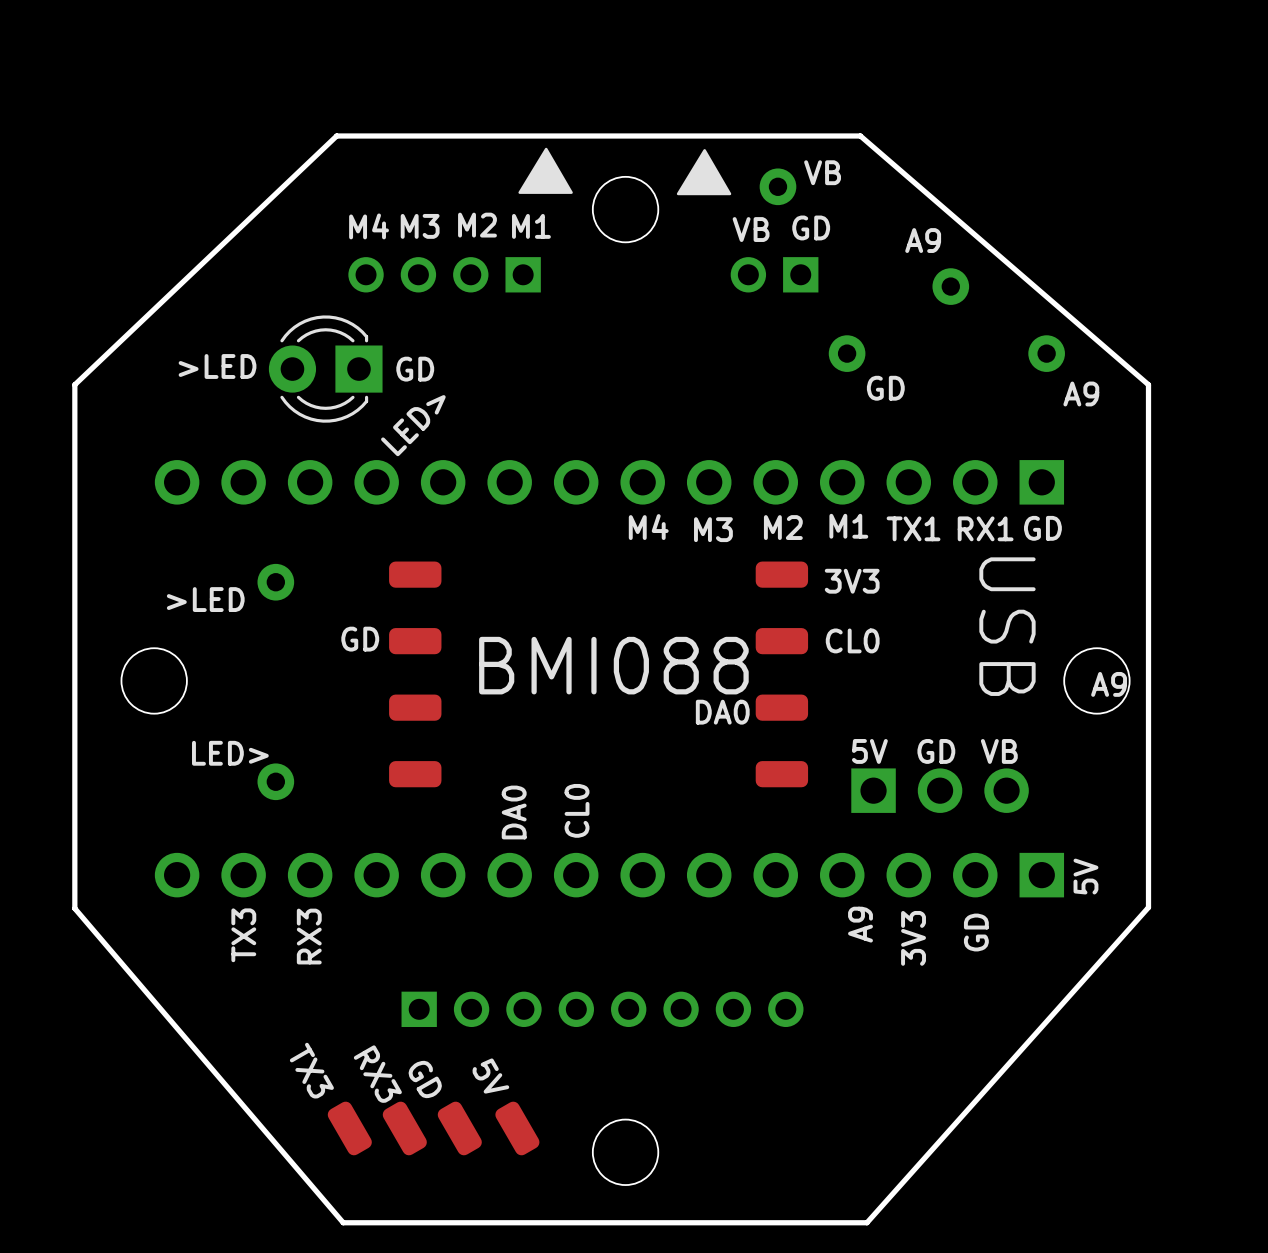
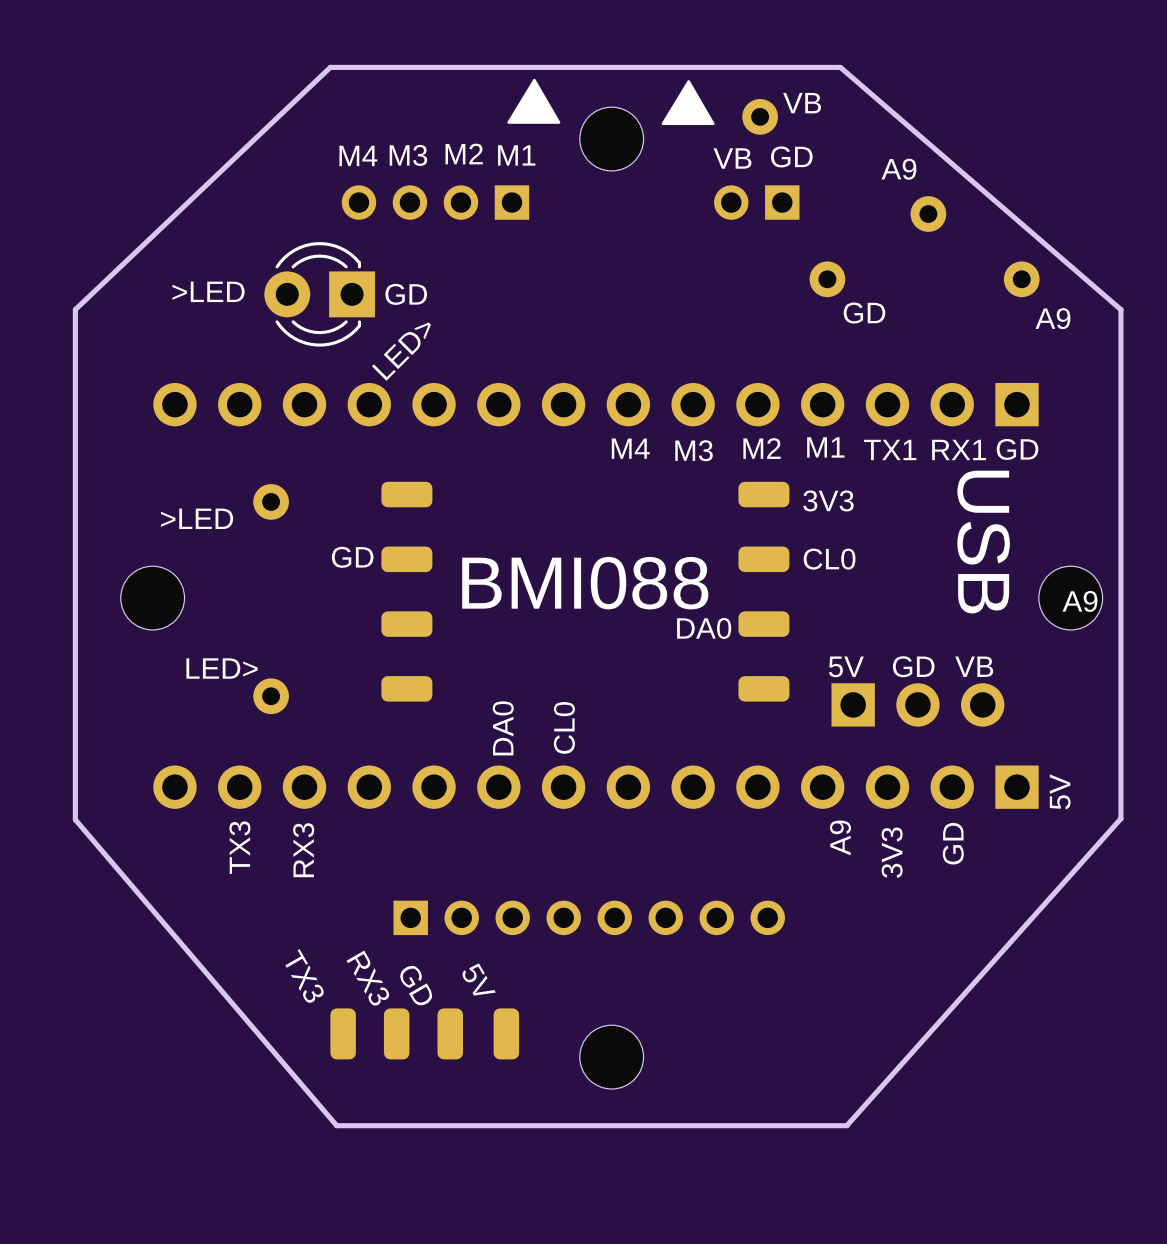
part rotation: 0° (349, 1128) -> 30° clockwise (343, 1033)
part rotation: 0° (404, 1128) -> 30° clockwise (396, 1033)
part rotation: 0° (459, 1128) -> 30° clockwise (450, 1033)
part rotation: 0° (517, 1128) -> 30° clockwise (506, 1033)

